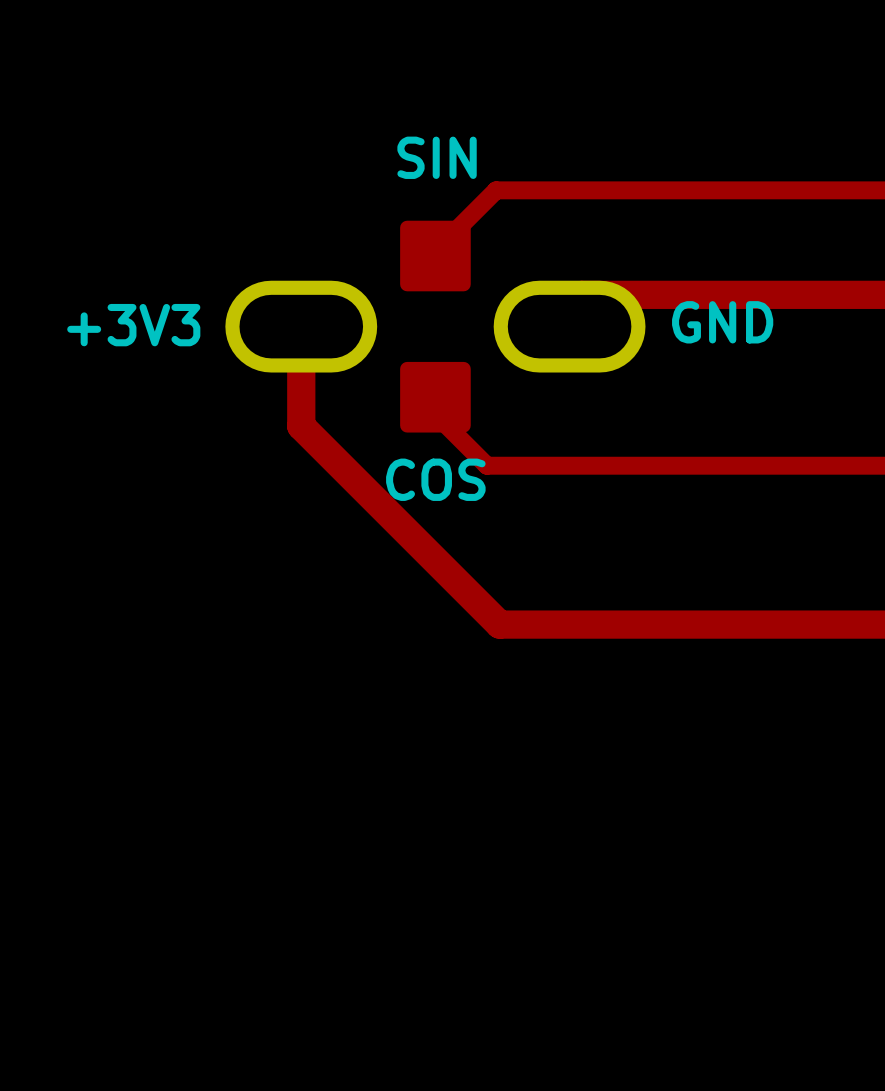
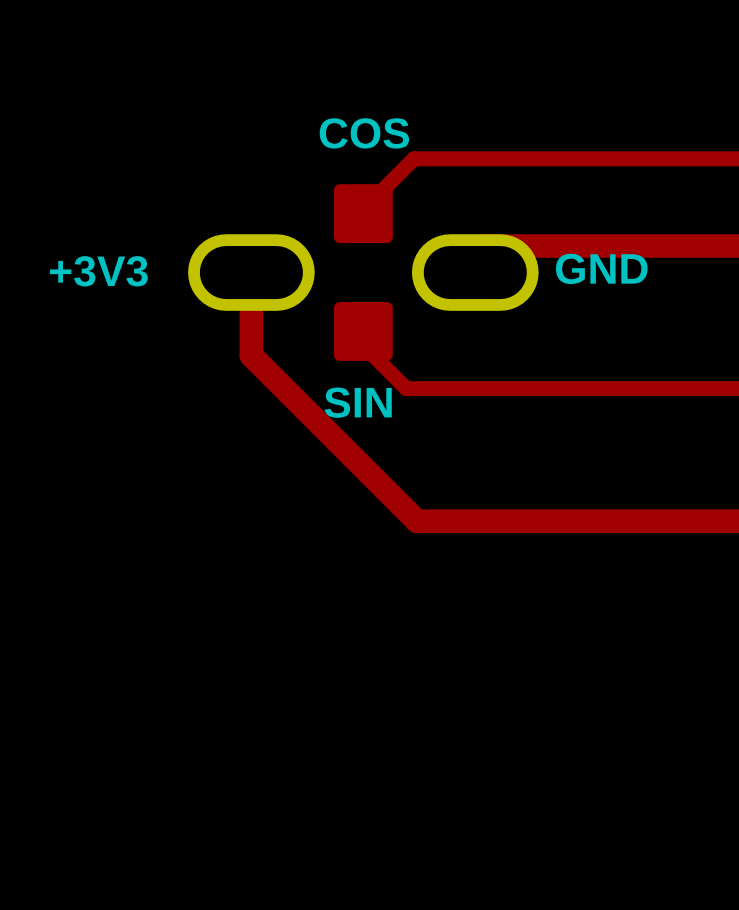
text: SIN (437, 157) -> COS (364, 133)
text: COS (435, 479) -> SIN (358, 402)

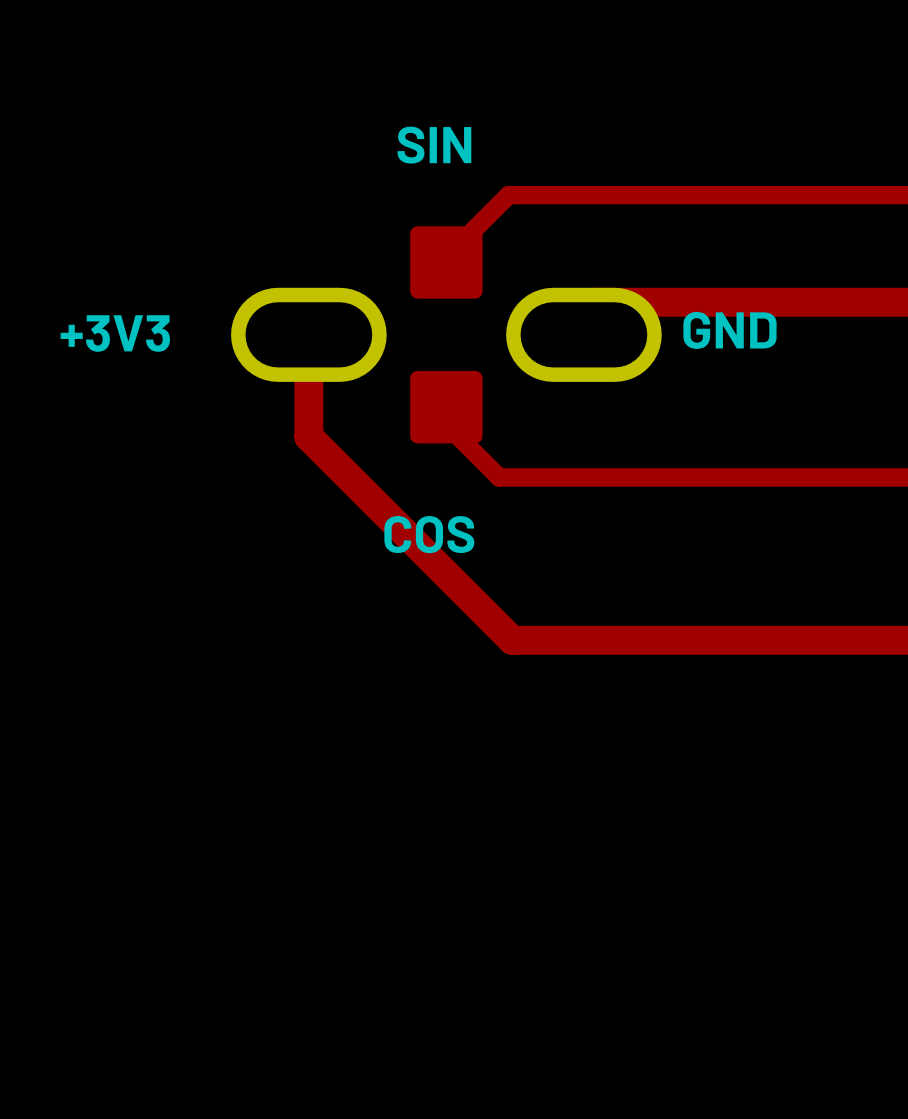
text: COS (364, 133) -> SIN (434, 145)
text: SIN (358, 402) -> COS (429, 534)

